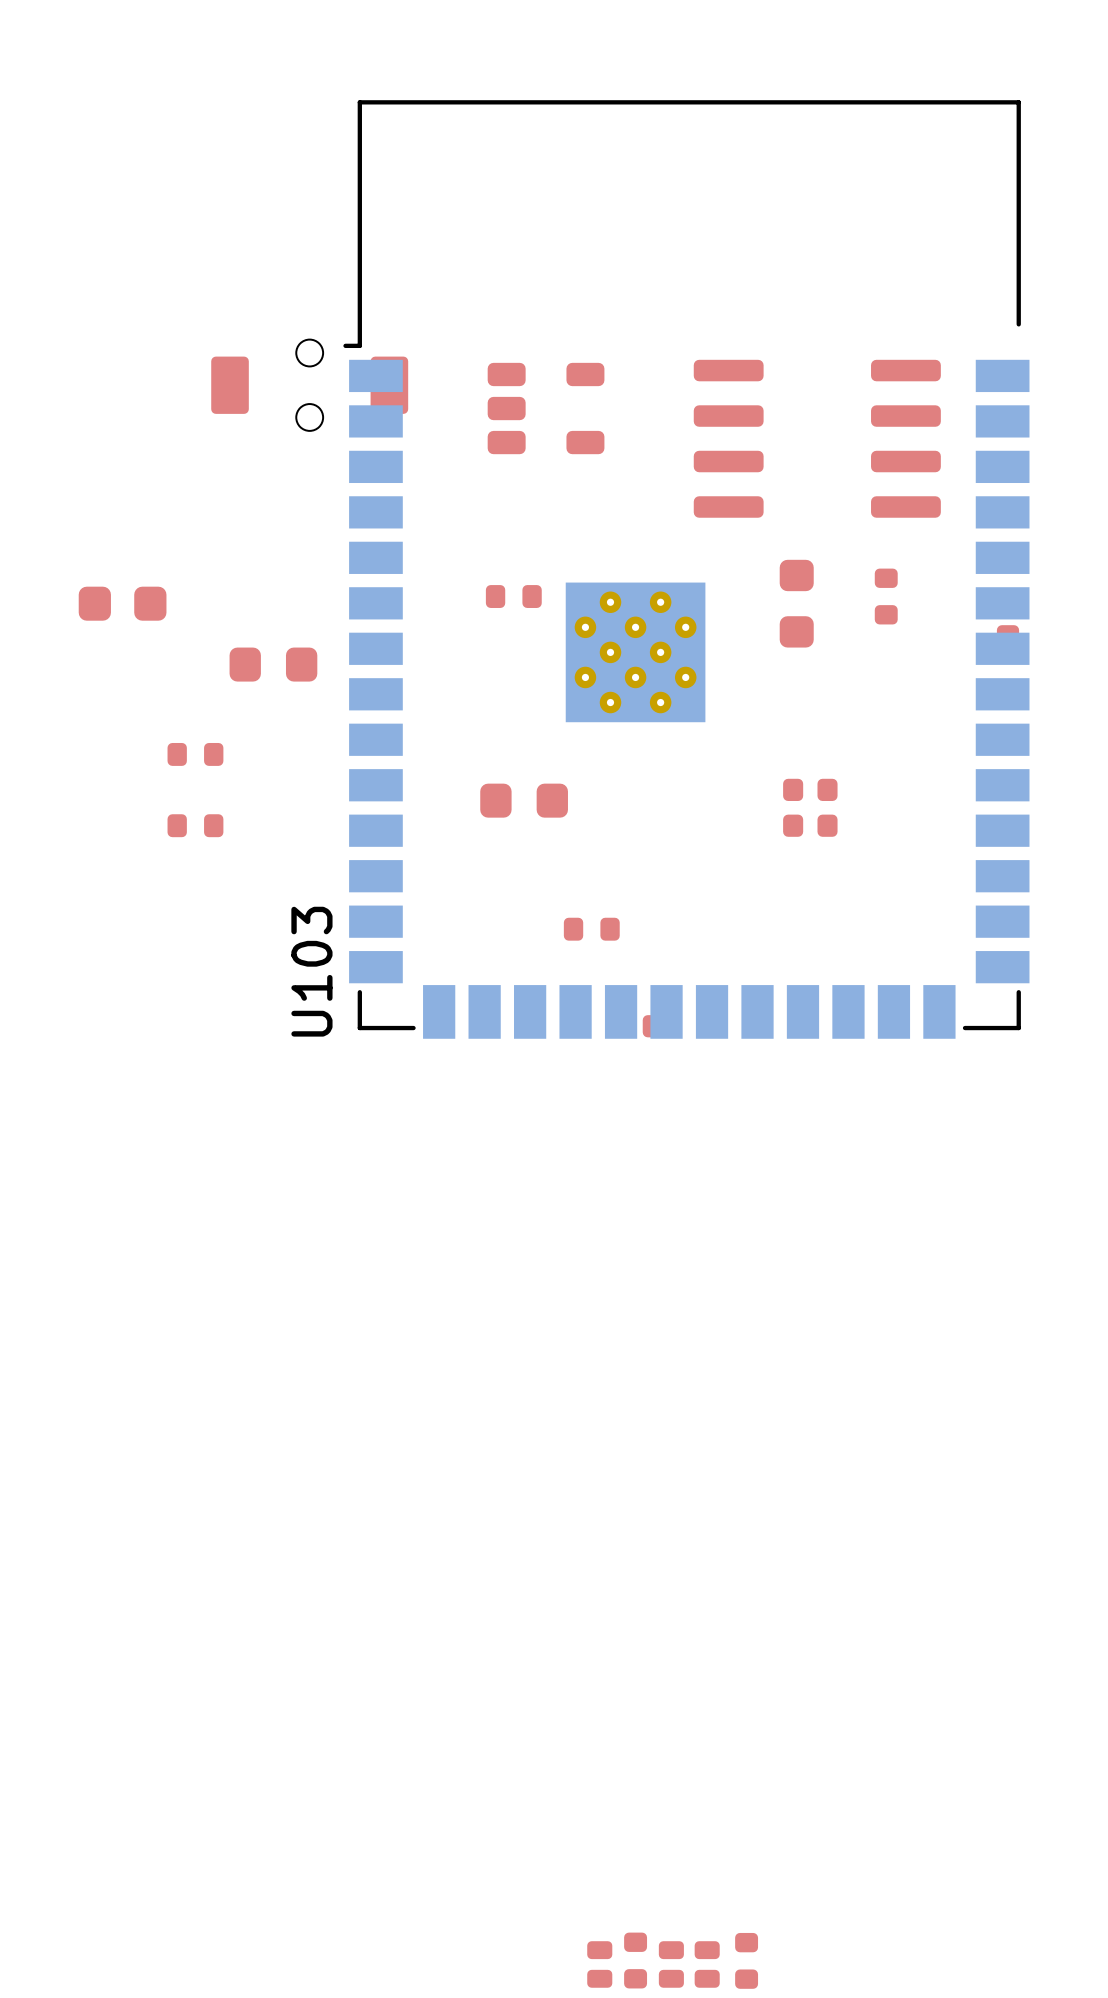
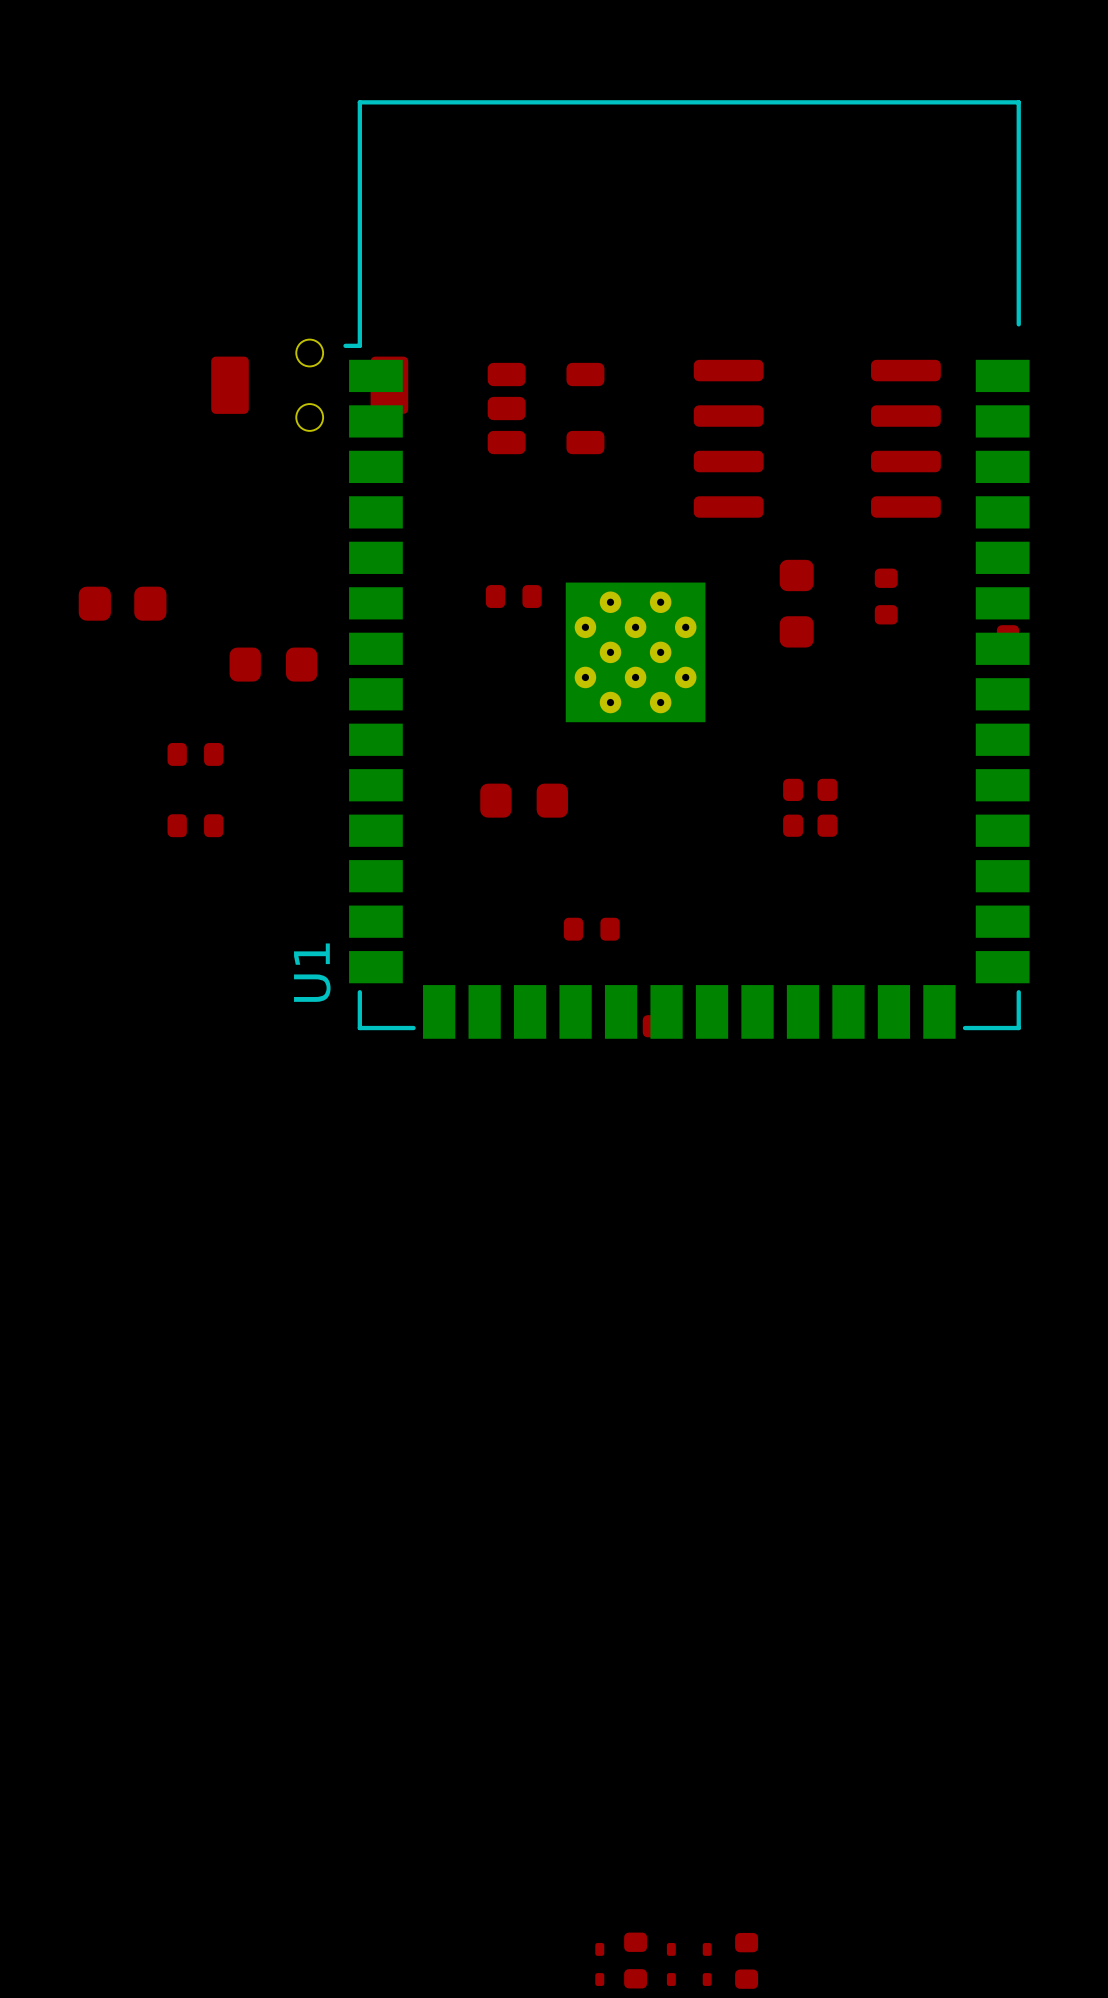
U103 name: U103 (311, 971) -> U1 (312, 972)
part footprint: [587, 1941, 613, 1988] -> [595, 1942, 605, 1986]
part footprint: [658, 1941, 684, 1988] -> [666, 1942, 676, 1986]
part footprint: [694, 1941, 720, 1988] -> [702, 1942, 712, 1986]

